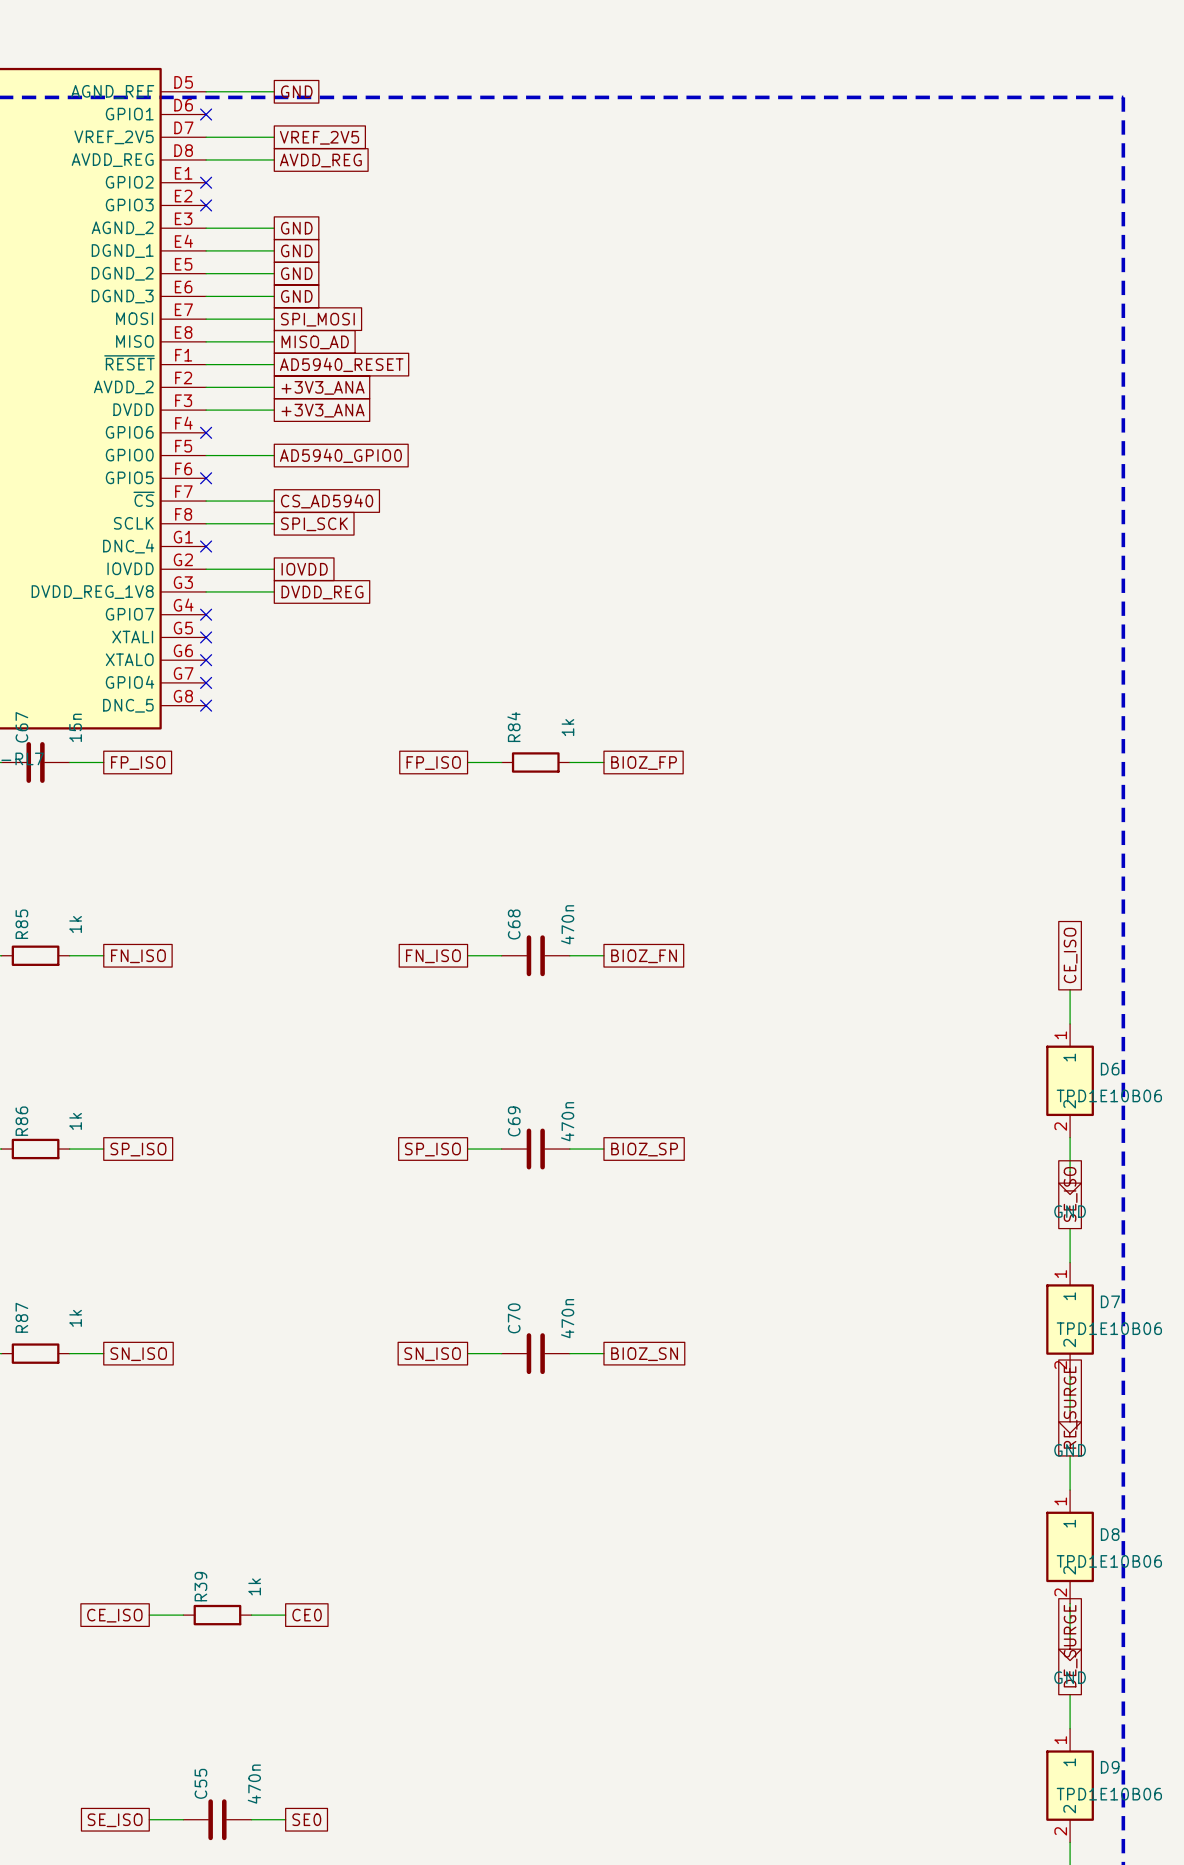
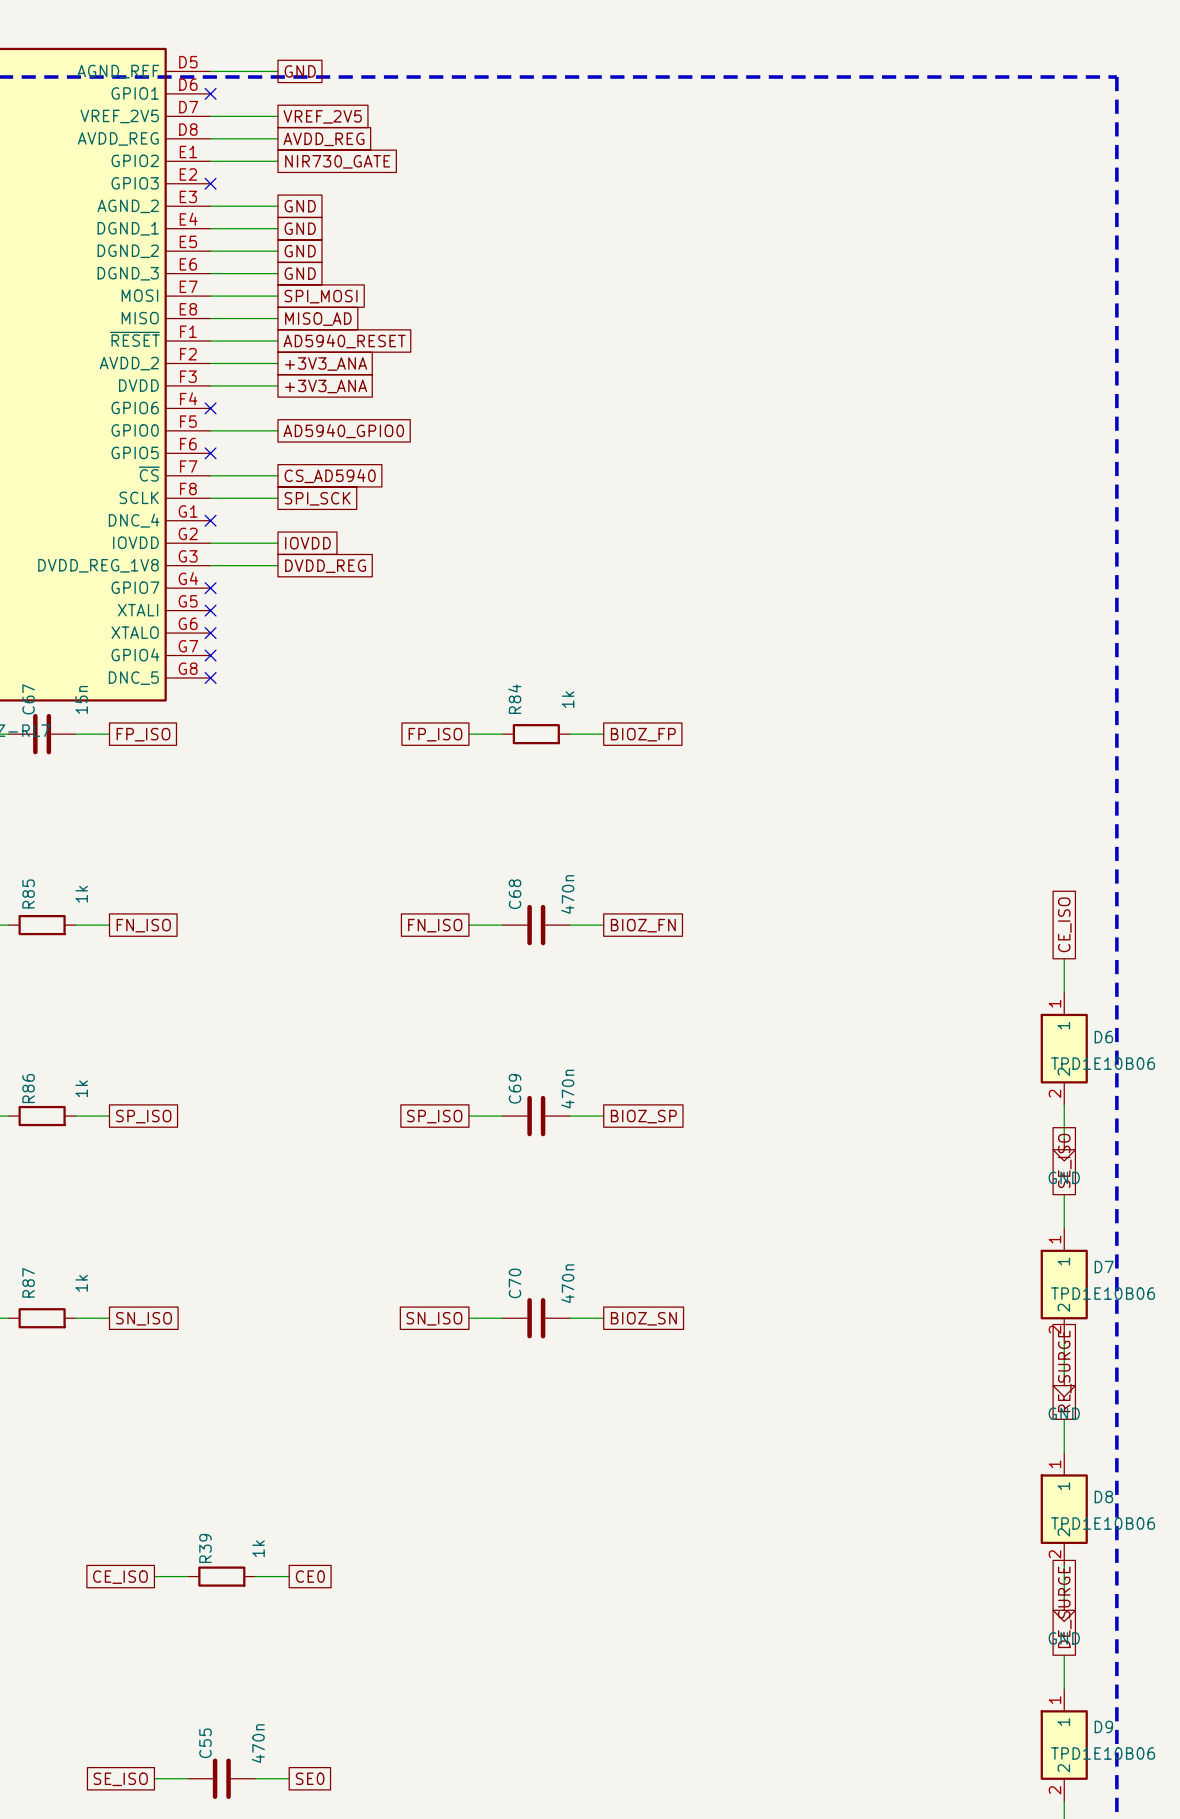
wire: none -> (210, 161) (277, 161)
no-connect mark: (206, 182) -> none
global label: none -> NIR730_GATE (337, 161)

